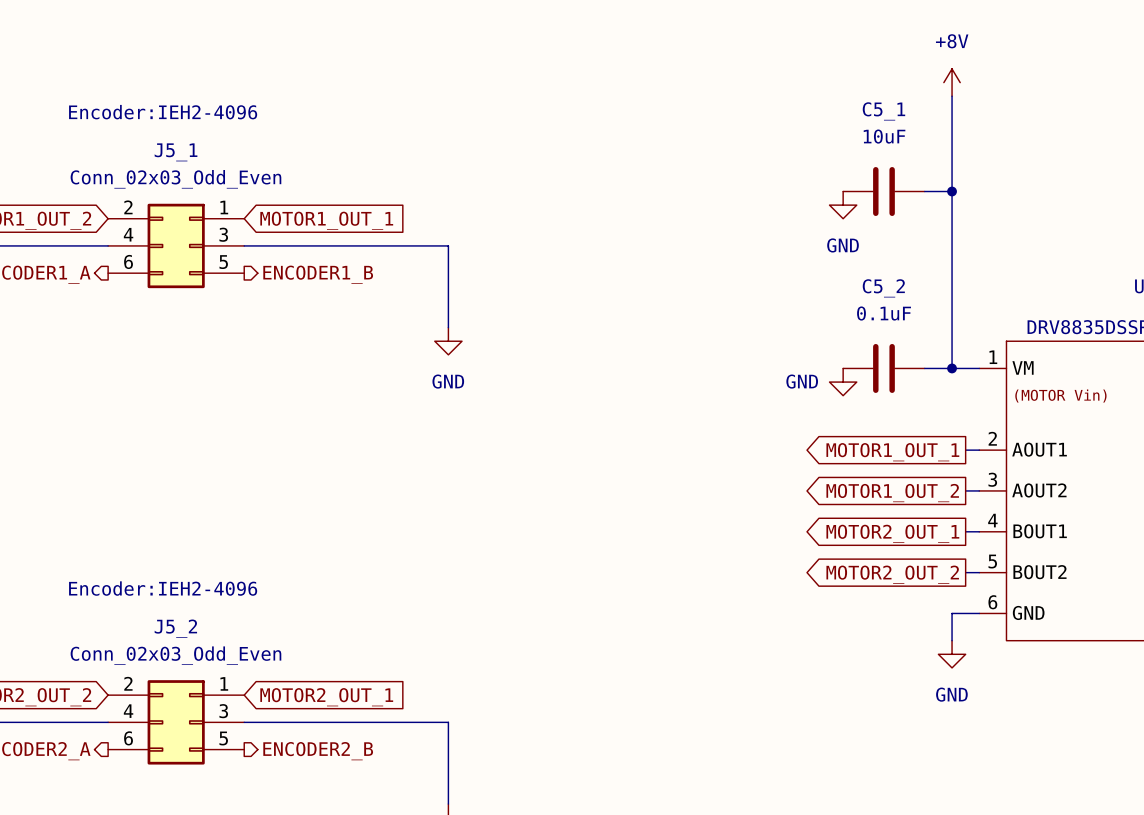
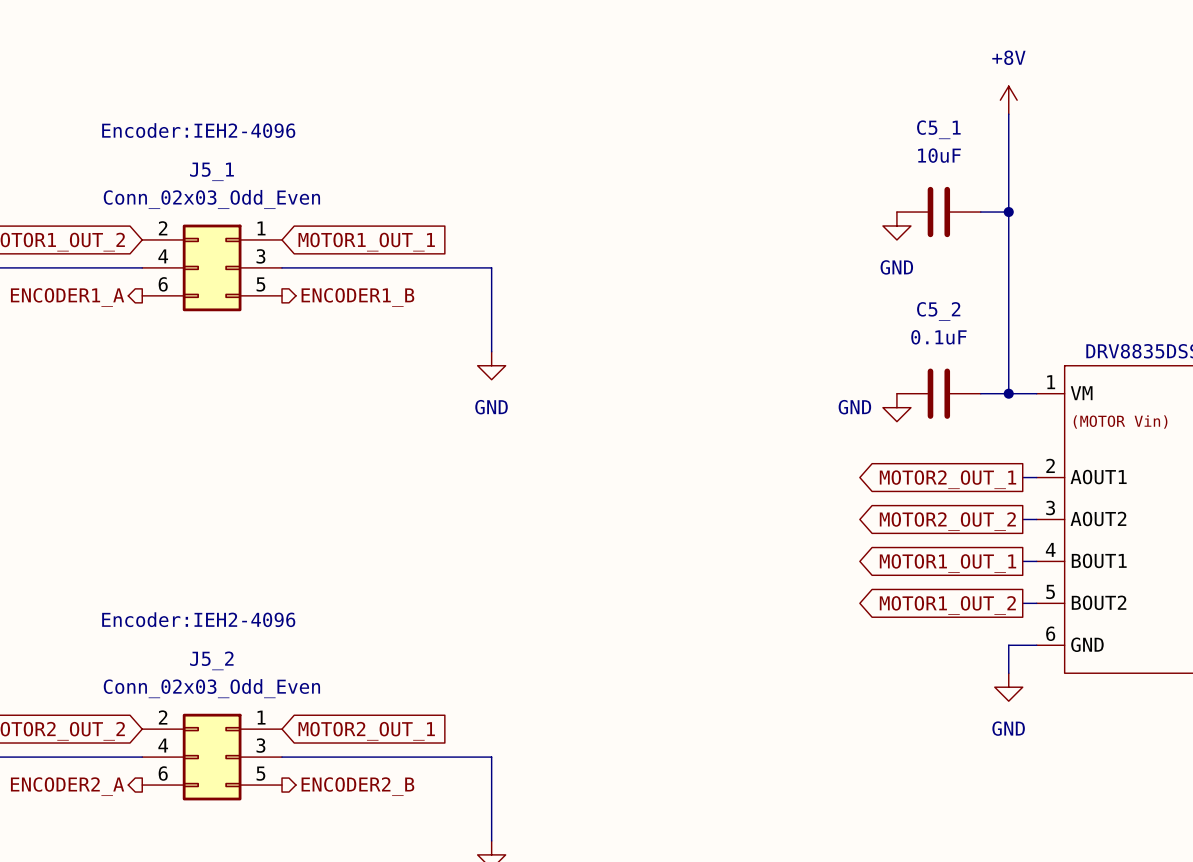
global label: MOTOR1_OUT_1 (892, 452) -> MOTOR2_OUT_1 (947, 479)
global label: MOTOR1_OUT_2 (892, 493) -> MOTOR2_OUT_2 (947, 521)
global label: MOTOR2_OUT_1 (892, 533) -> MOTOR1_OUT_1 (947, 563)
global label: MOTOR2_OUT_2 (892, 574) -> MOTOR1_OUT_2 (947, 605)

